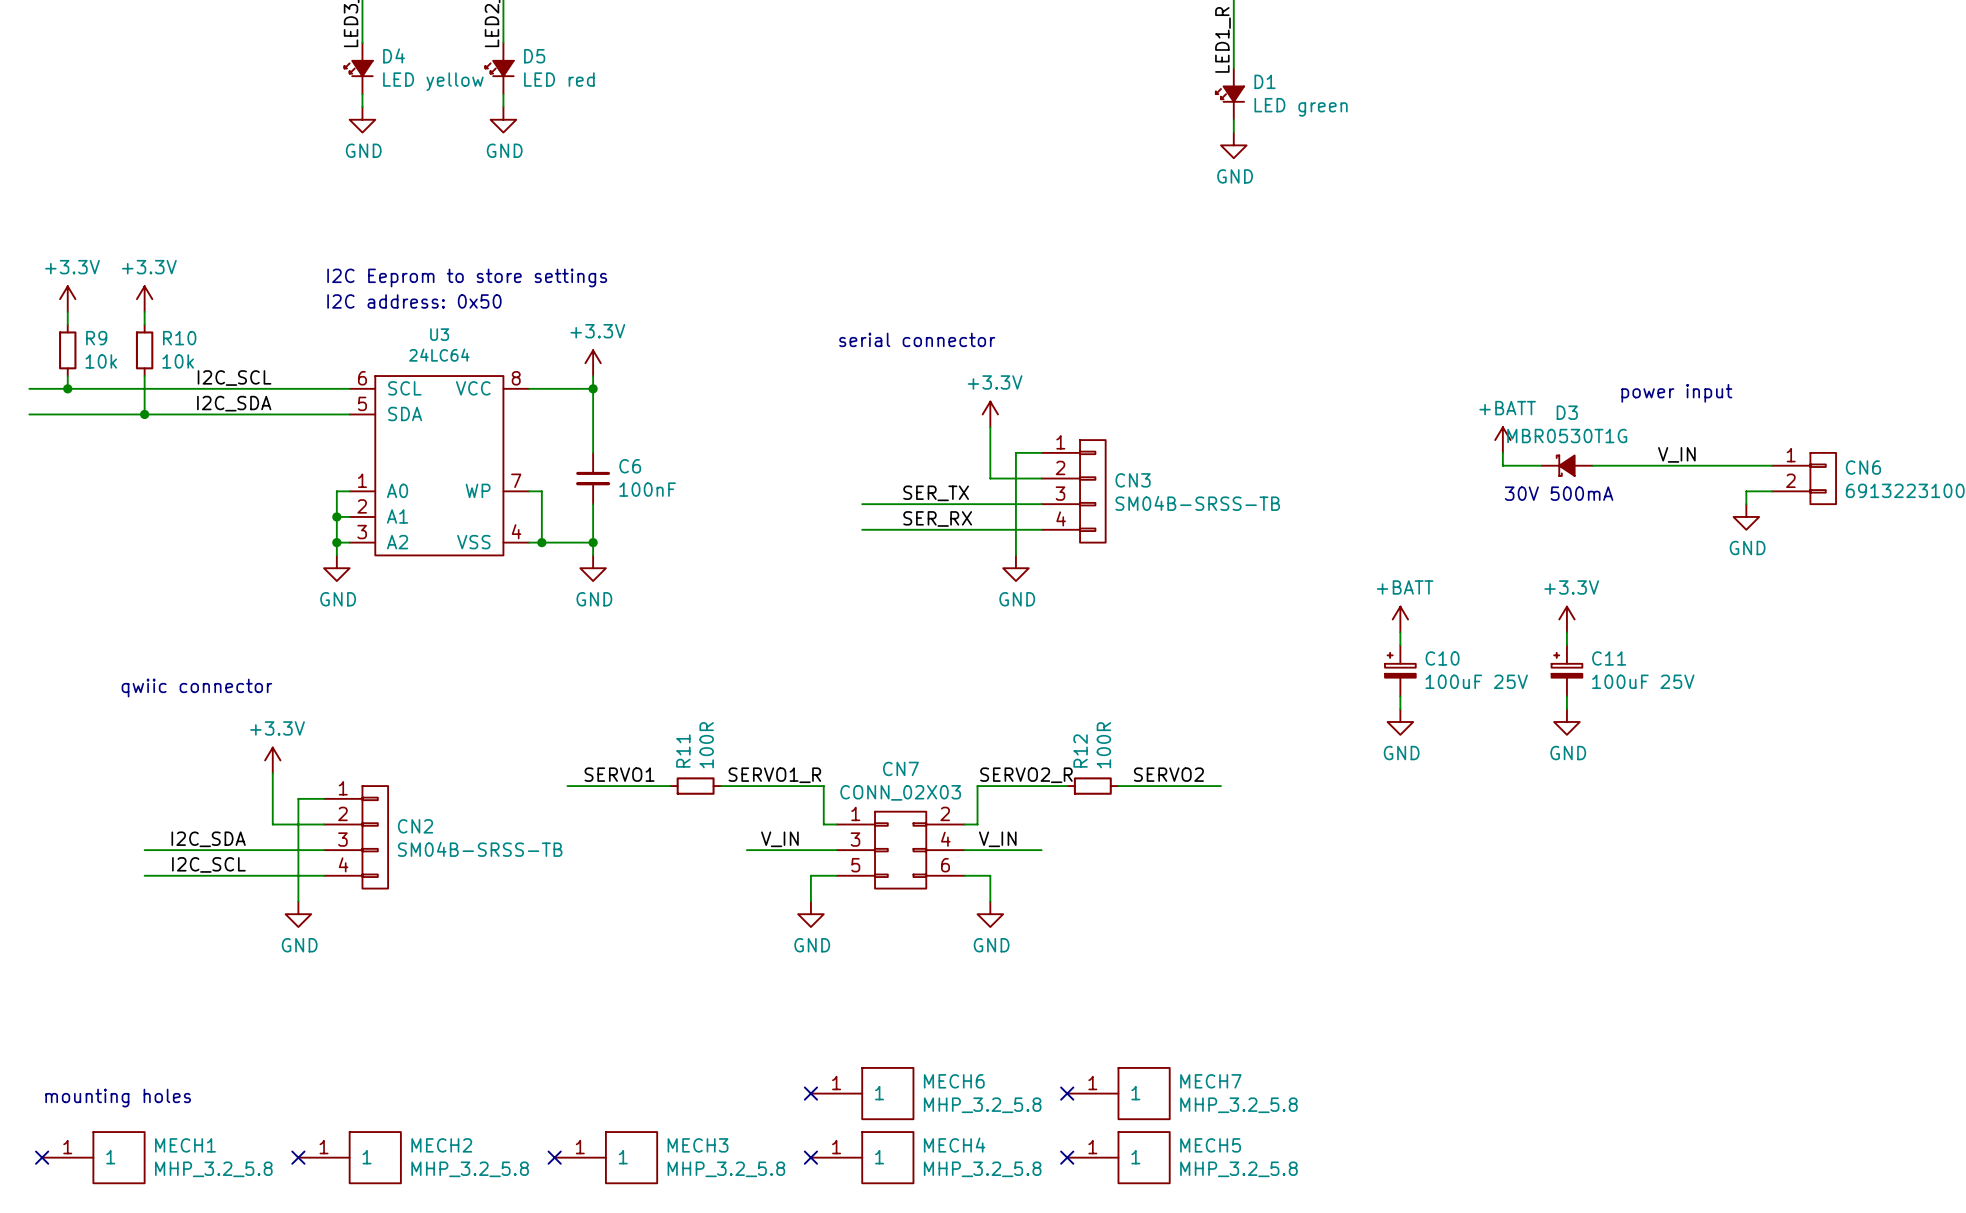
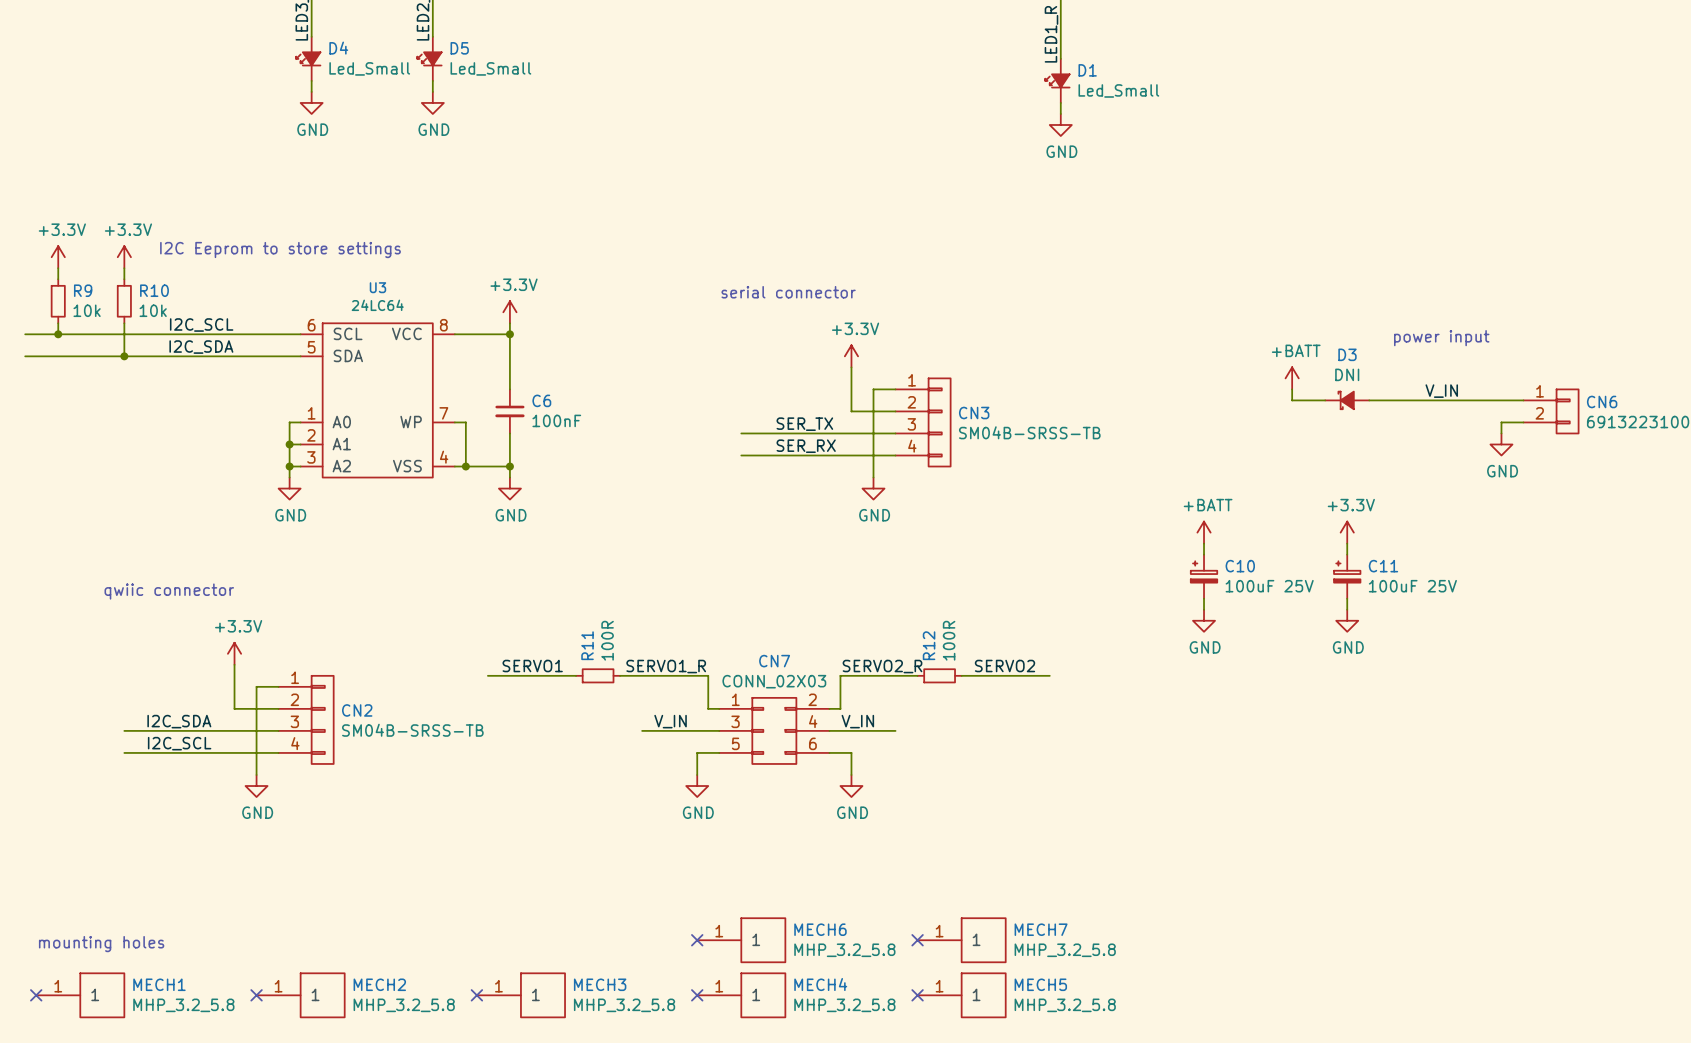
D5 value: LED red (559, 79) -> Led_Small (490, 68)
D4 value: LED yellow (433, 81) -> Led_Small (369, 68)
D1 value: LED green (1301, 107) -> Led_Small (1118, 90)
text position: I2C Eeprom to store settings (467, 277) -> I2C Eeprom to store settings (280, 250)
text: I2C address: 0x50 (414, 301) -> none
D3 value: MBR0530T1G (1567, 436) -> DNI (1347, 374)
text: 30V 500mA (1559, 493) -> none

